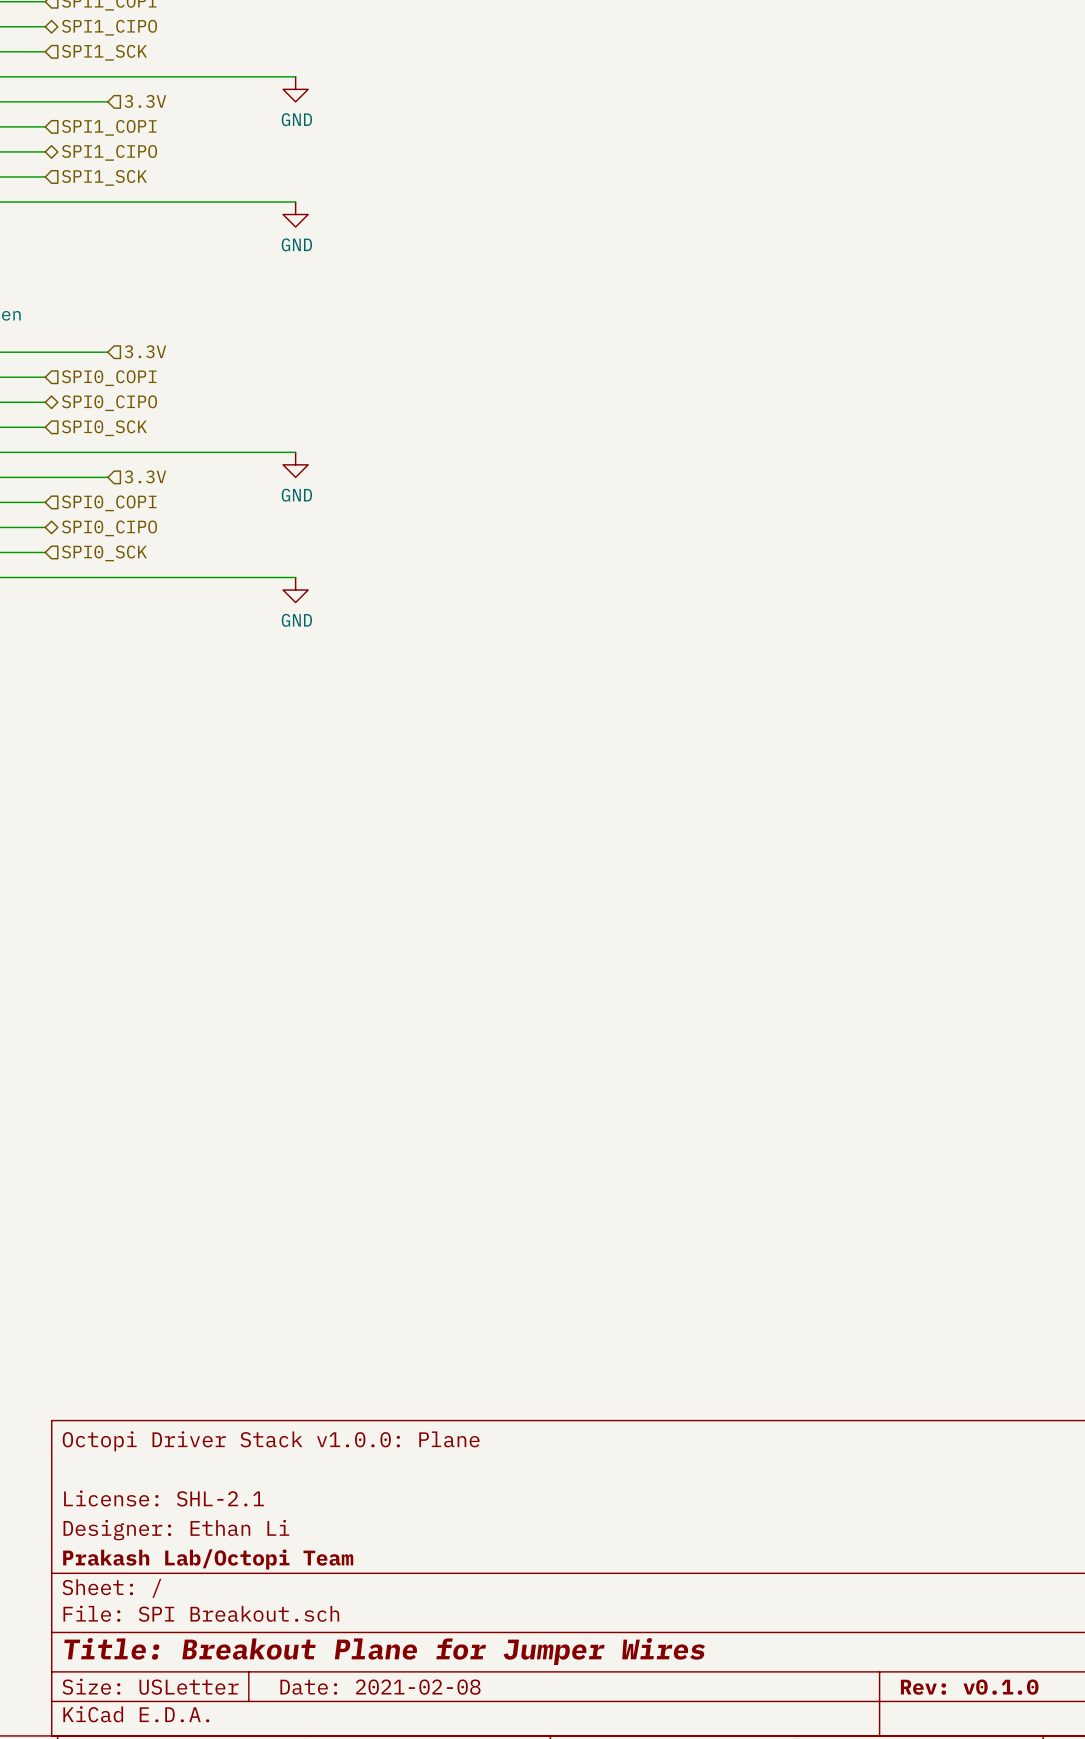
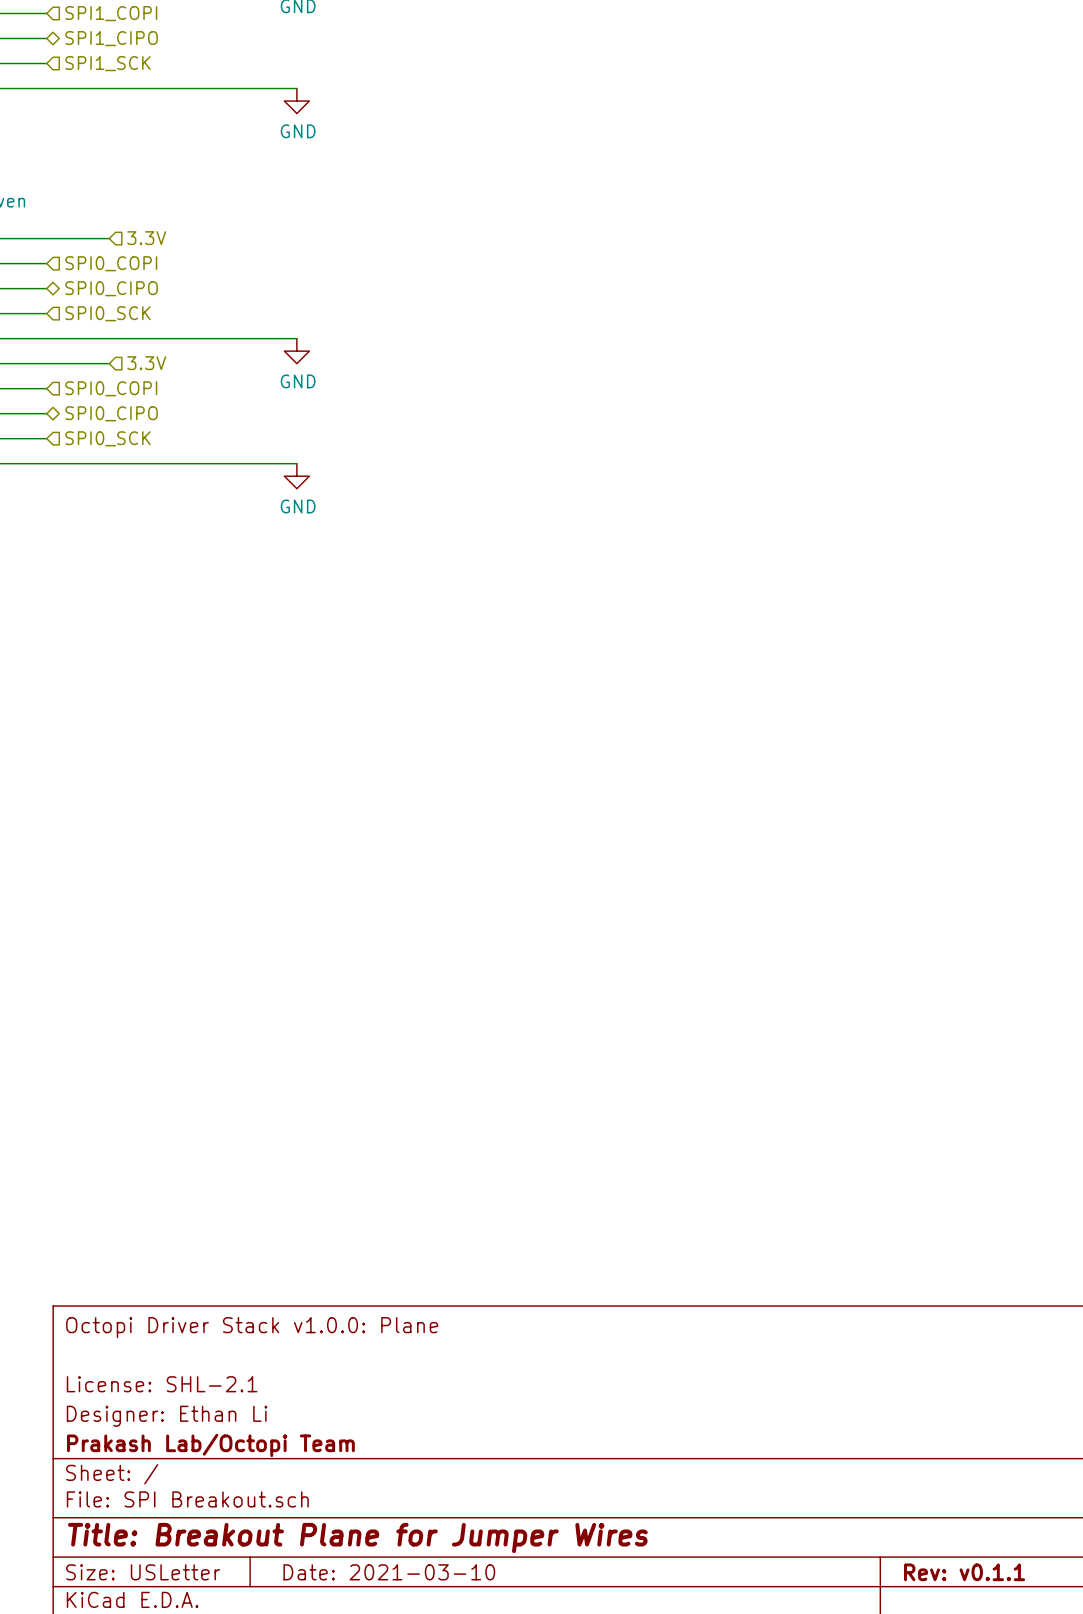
title block: Date: 2021-02-08 (380, 1687) -> Date: 2021-03-10 (389, 1572)
title block: Rev: v0.1.0 (969, 1687) -> Rev: v0.1.1 (964, 1572)

